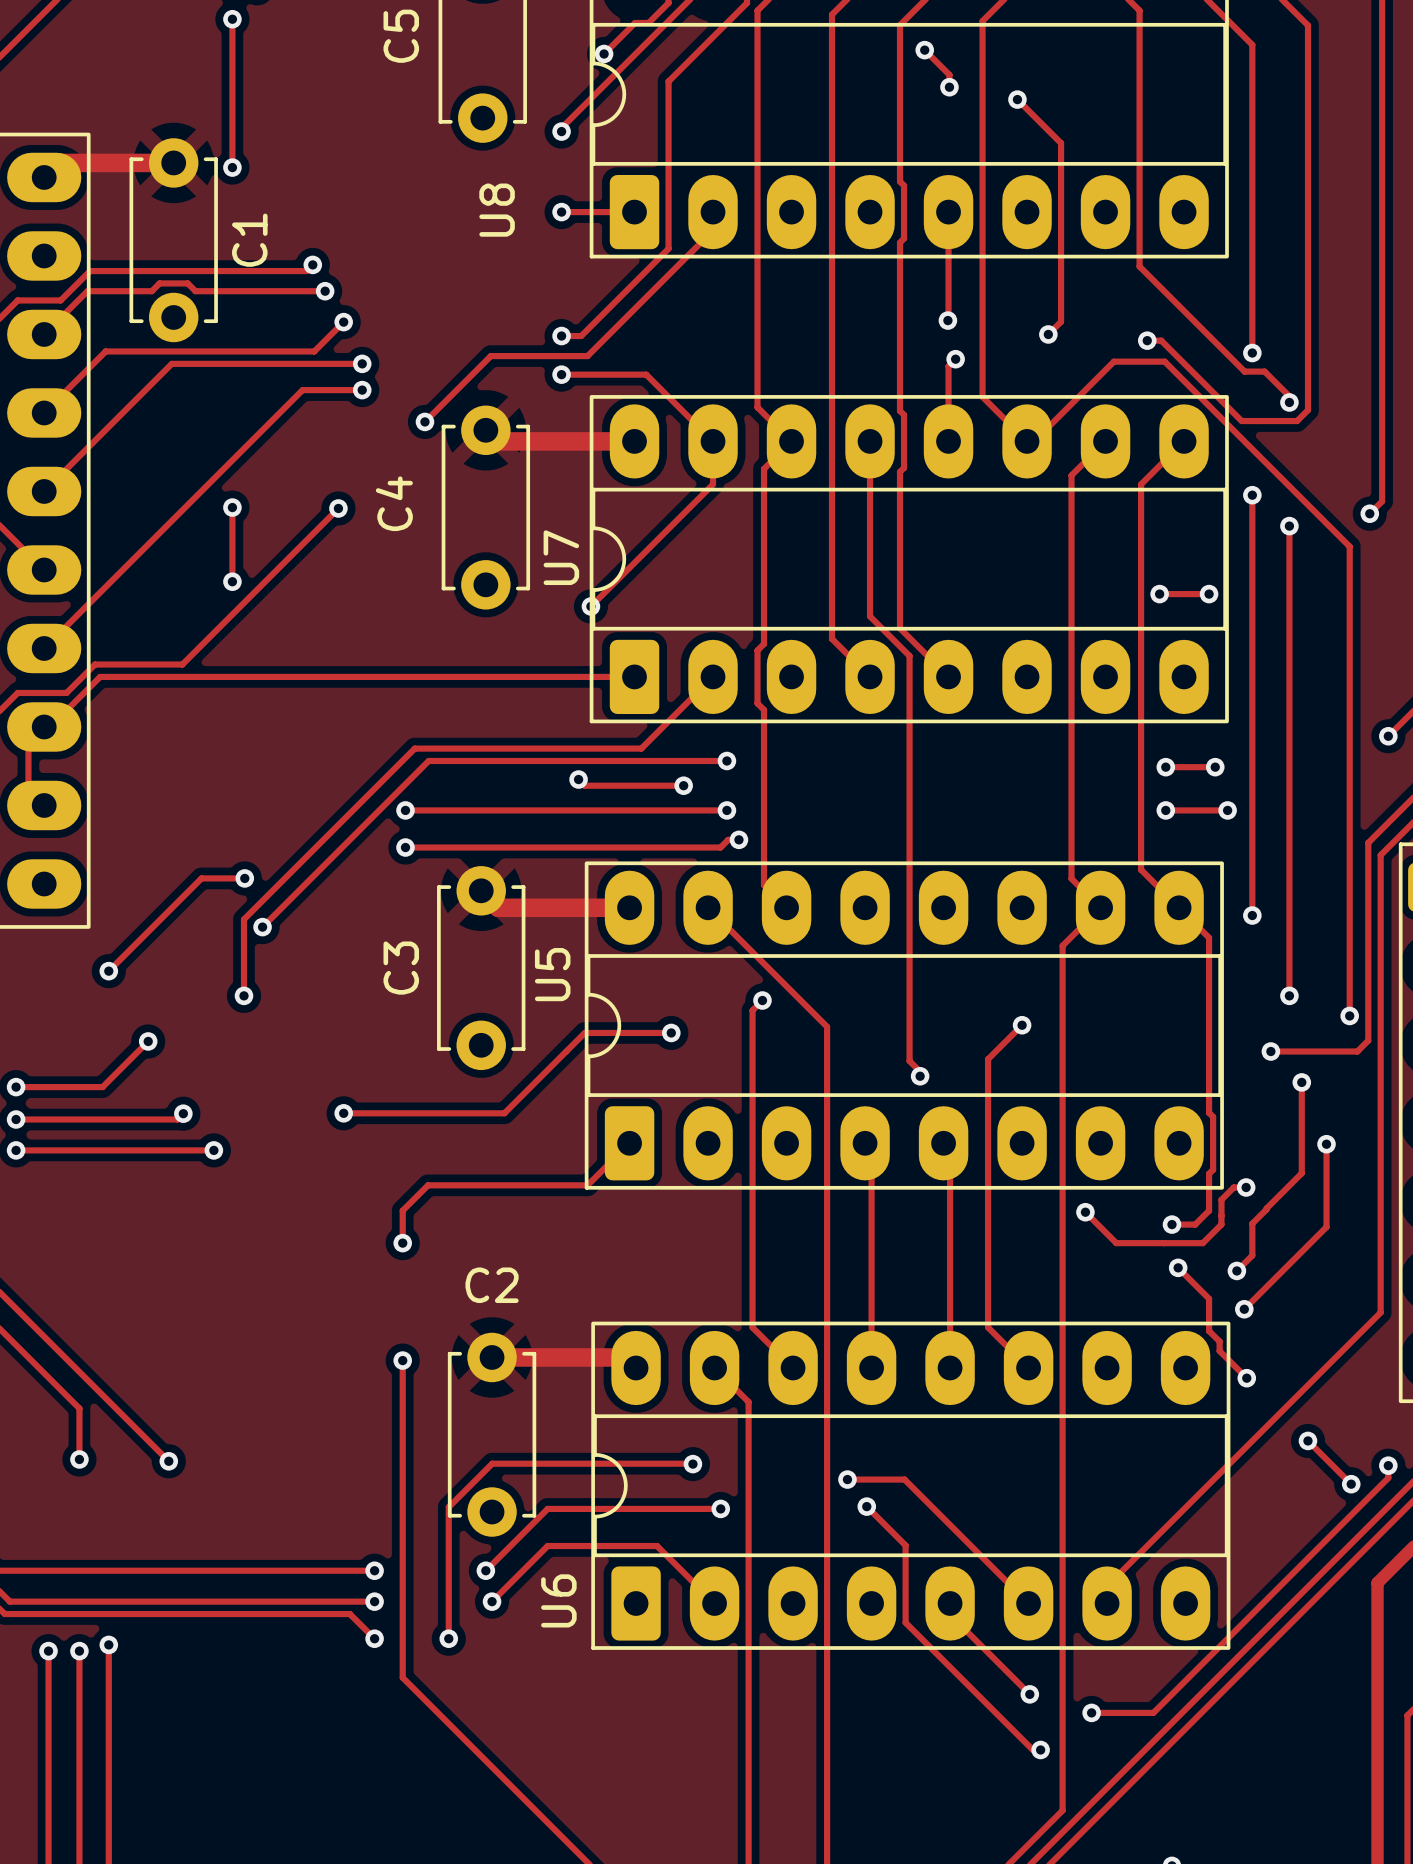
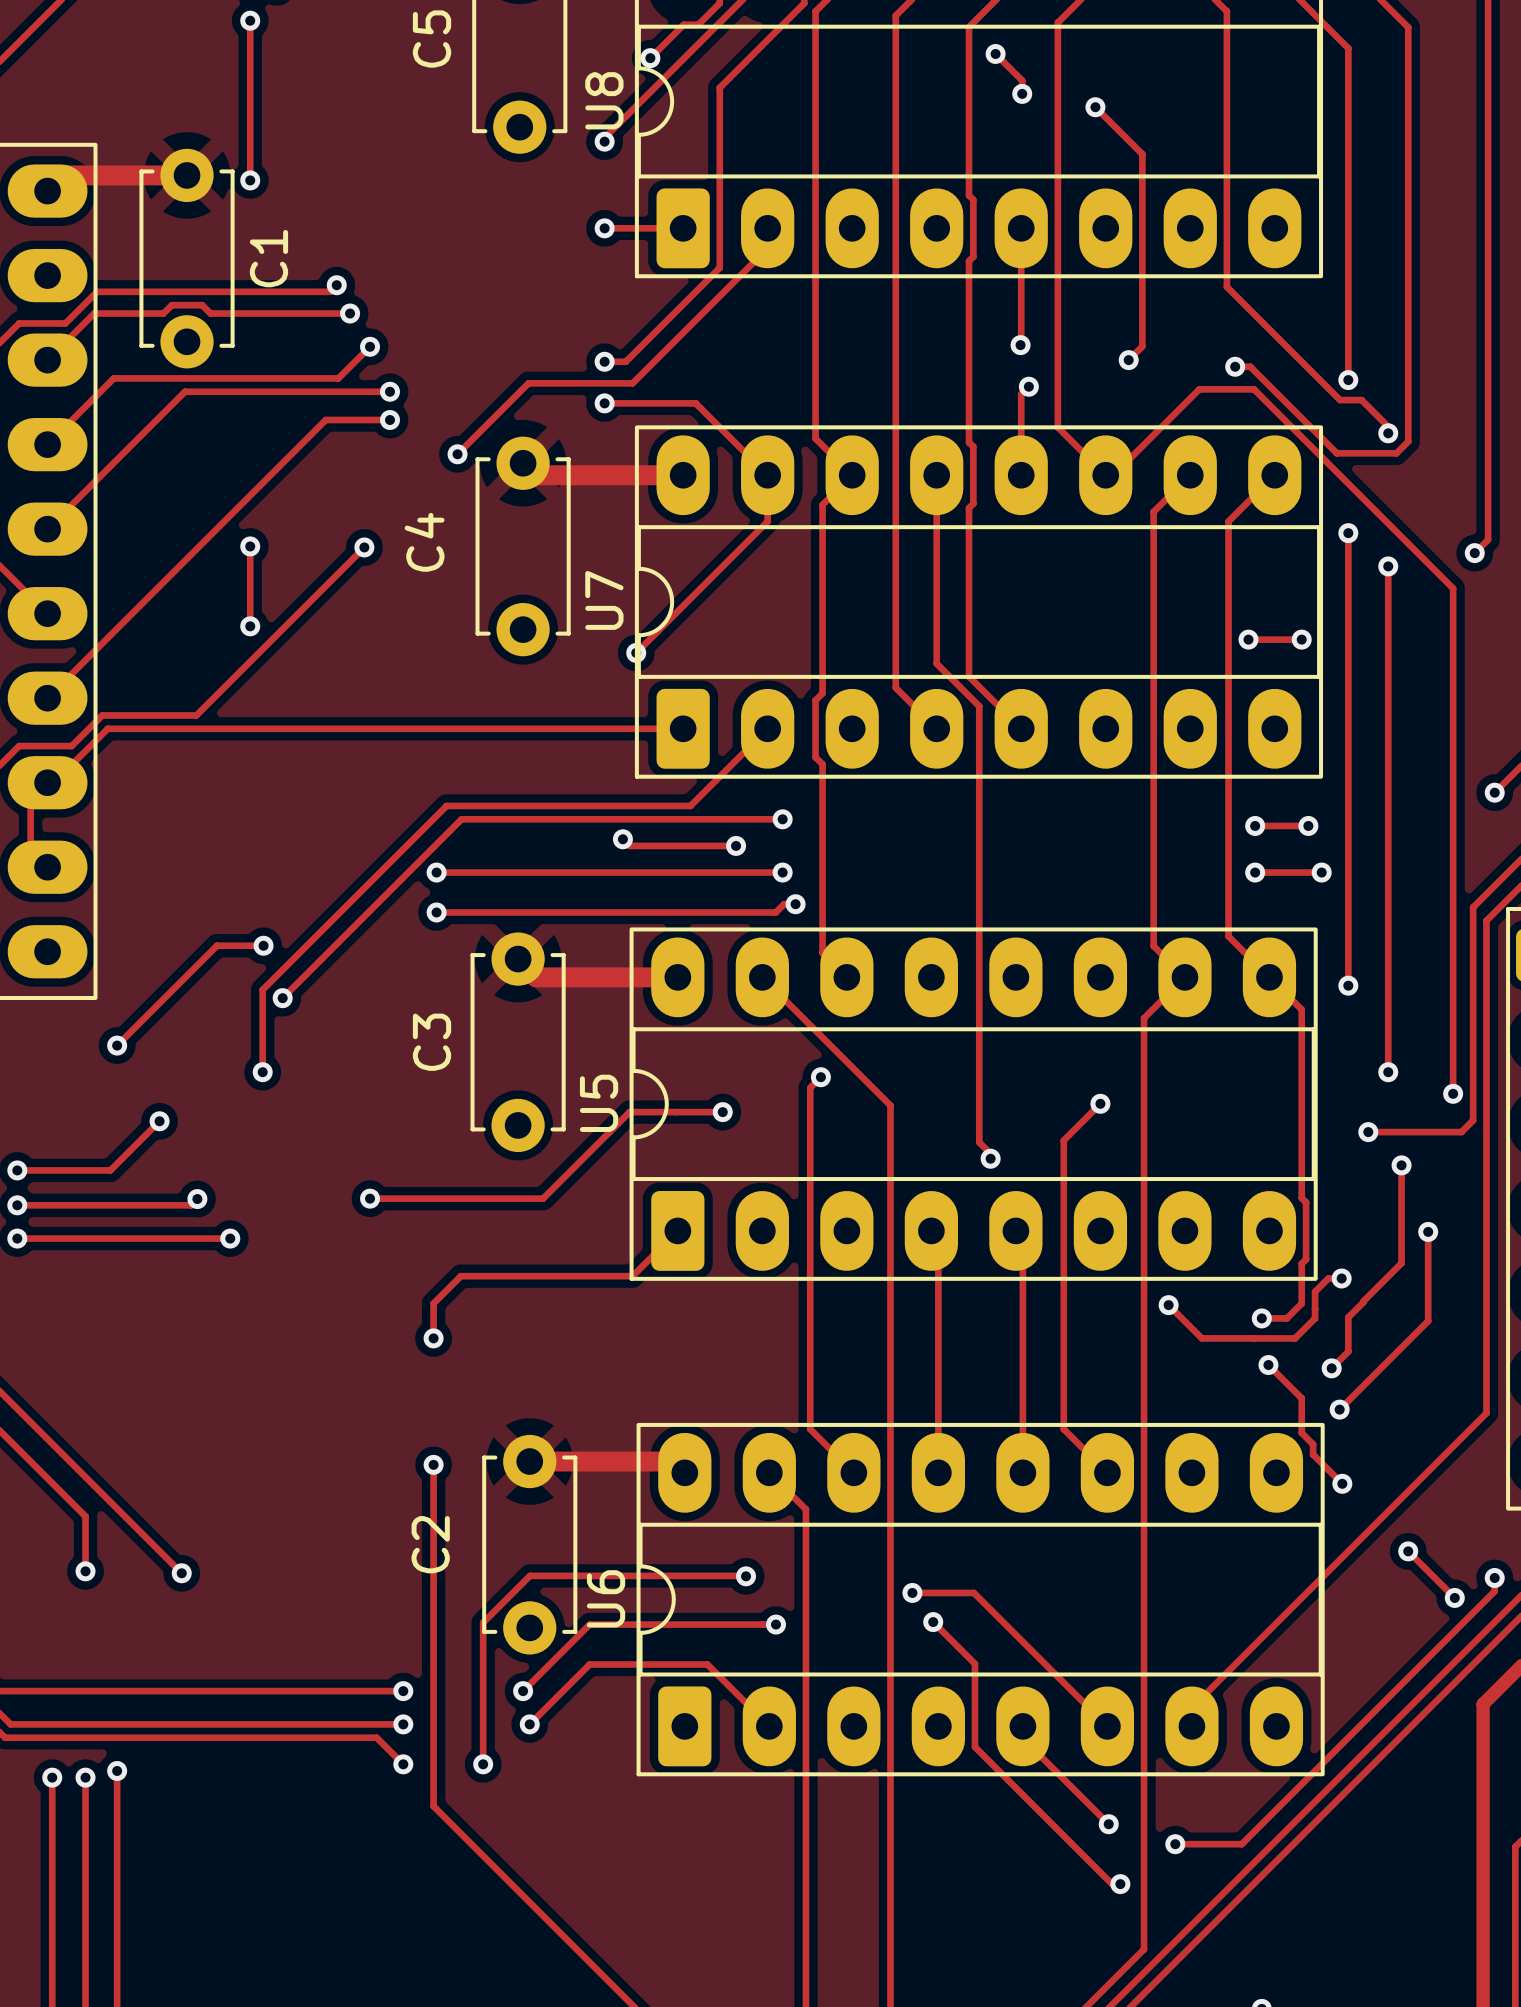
U8 name position: U8 (497, 210) -> U8 (604, 100)
U5 name position: U5 (552, 974) -> U5 (599, 1103)
C2 name rotation: 0° (492, 1285) -> 90° counterclockwise (430, 1544)
C2 name position: C2 (492, 1285) -> C2 (430, 1544)
U6 name position: U6 (558, 1600) -> U6 (606, 1598)

